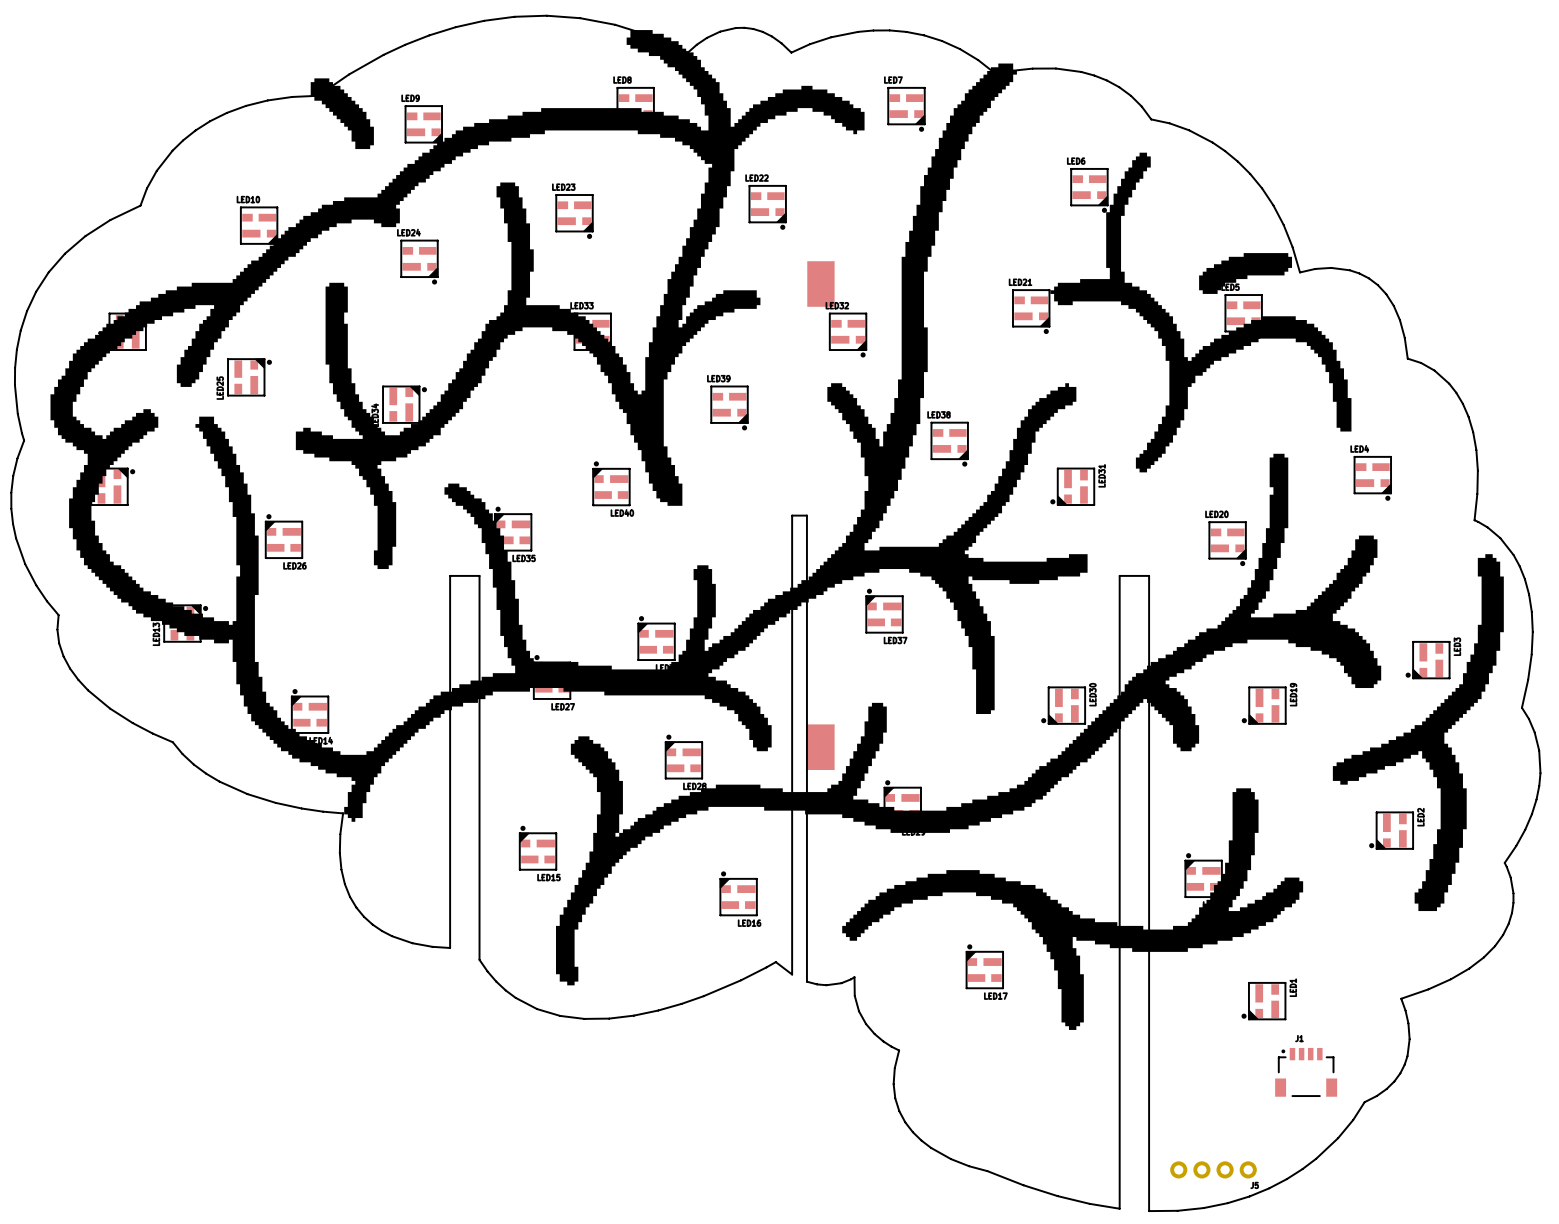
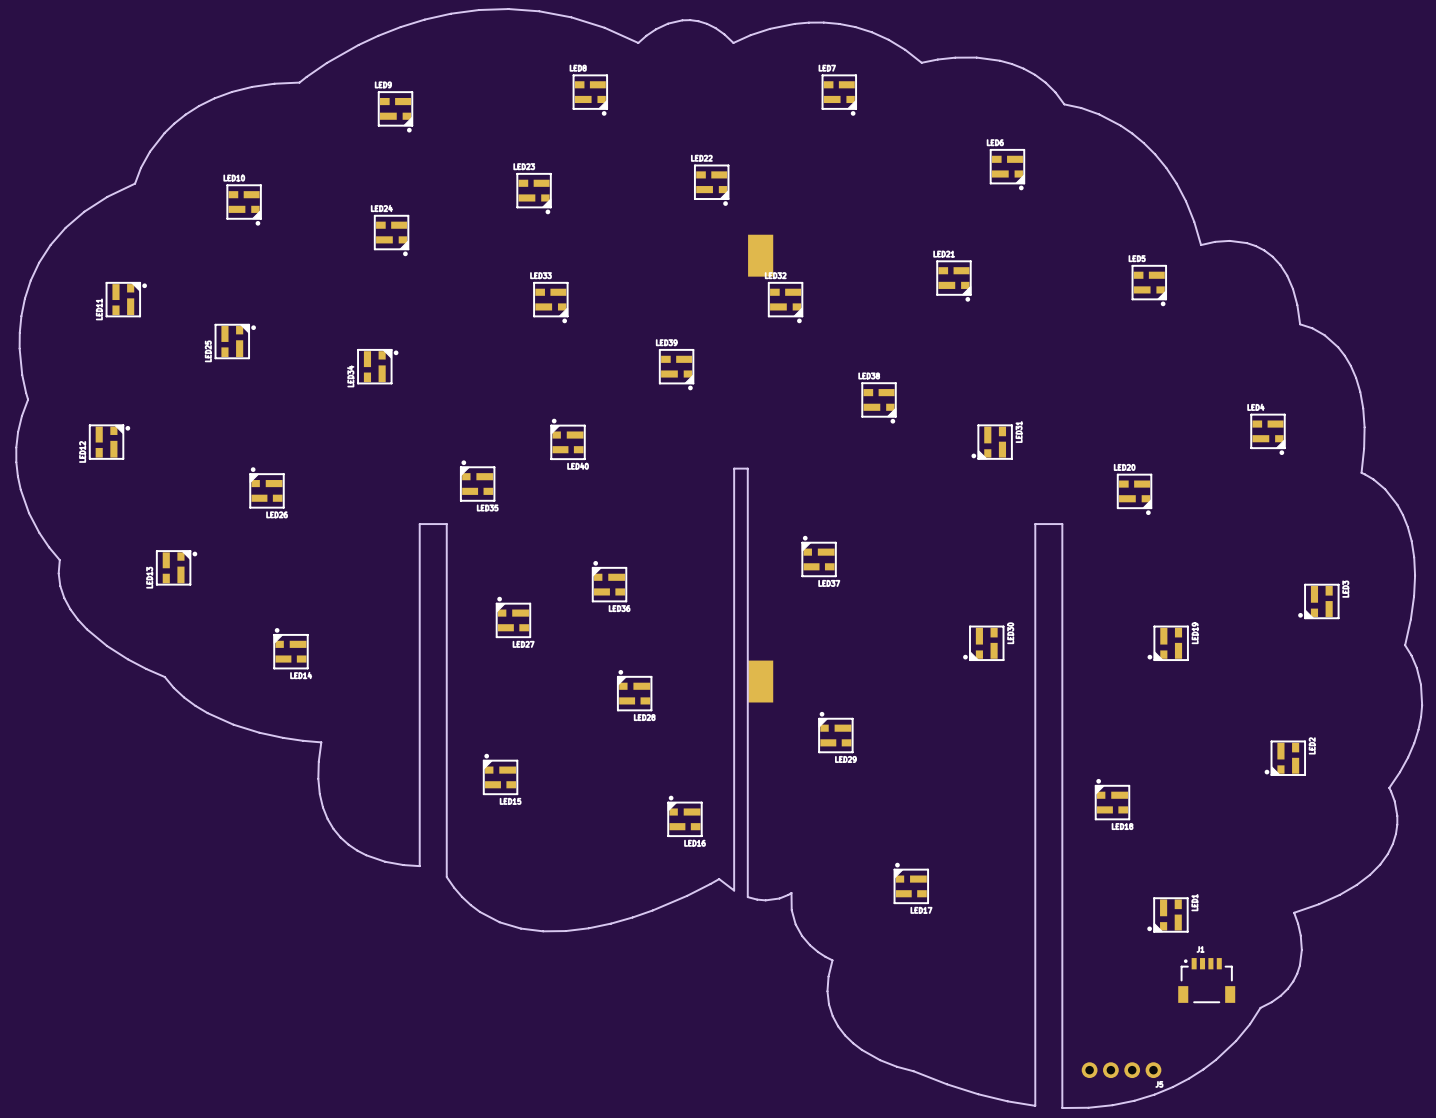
drawing: [50, 30, 1504, 1030] -> none

